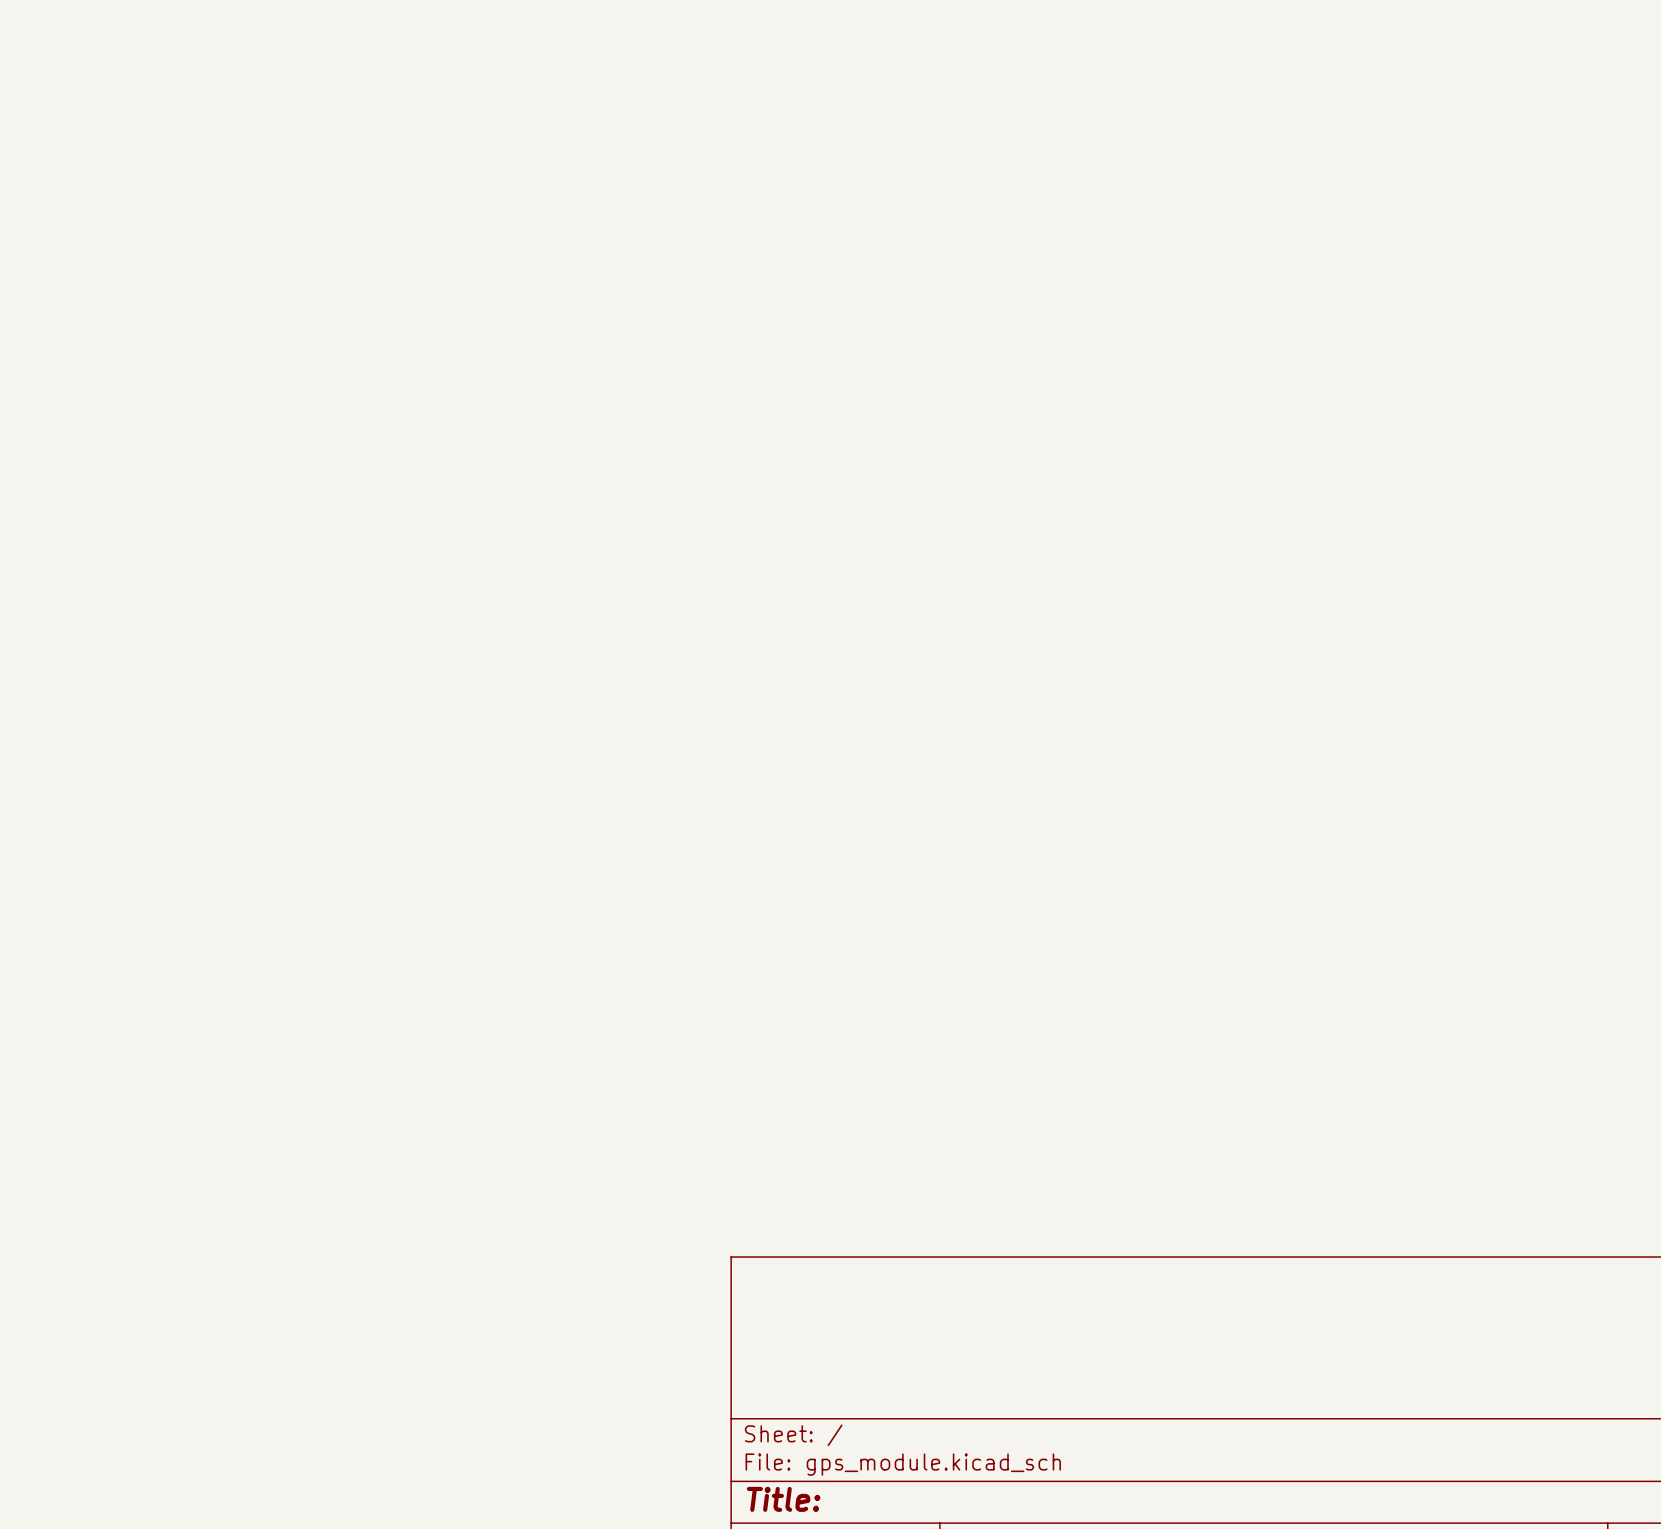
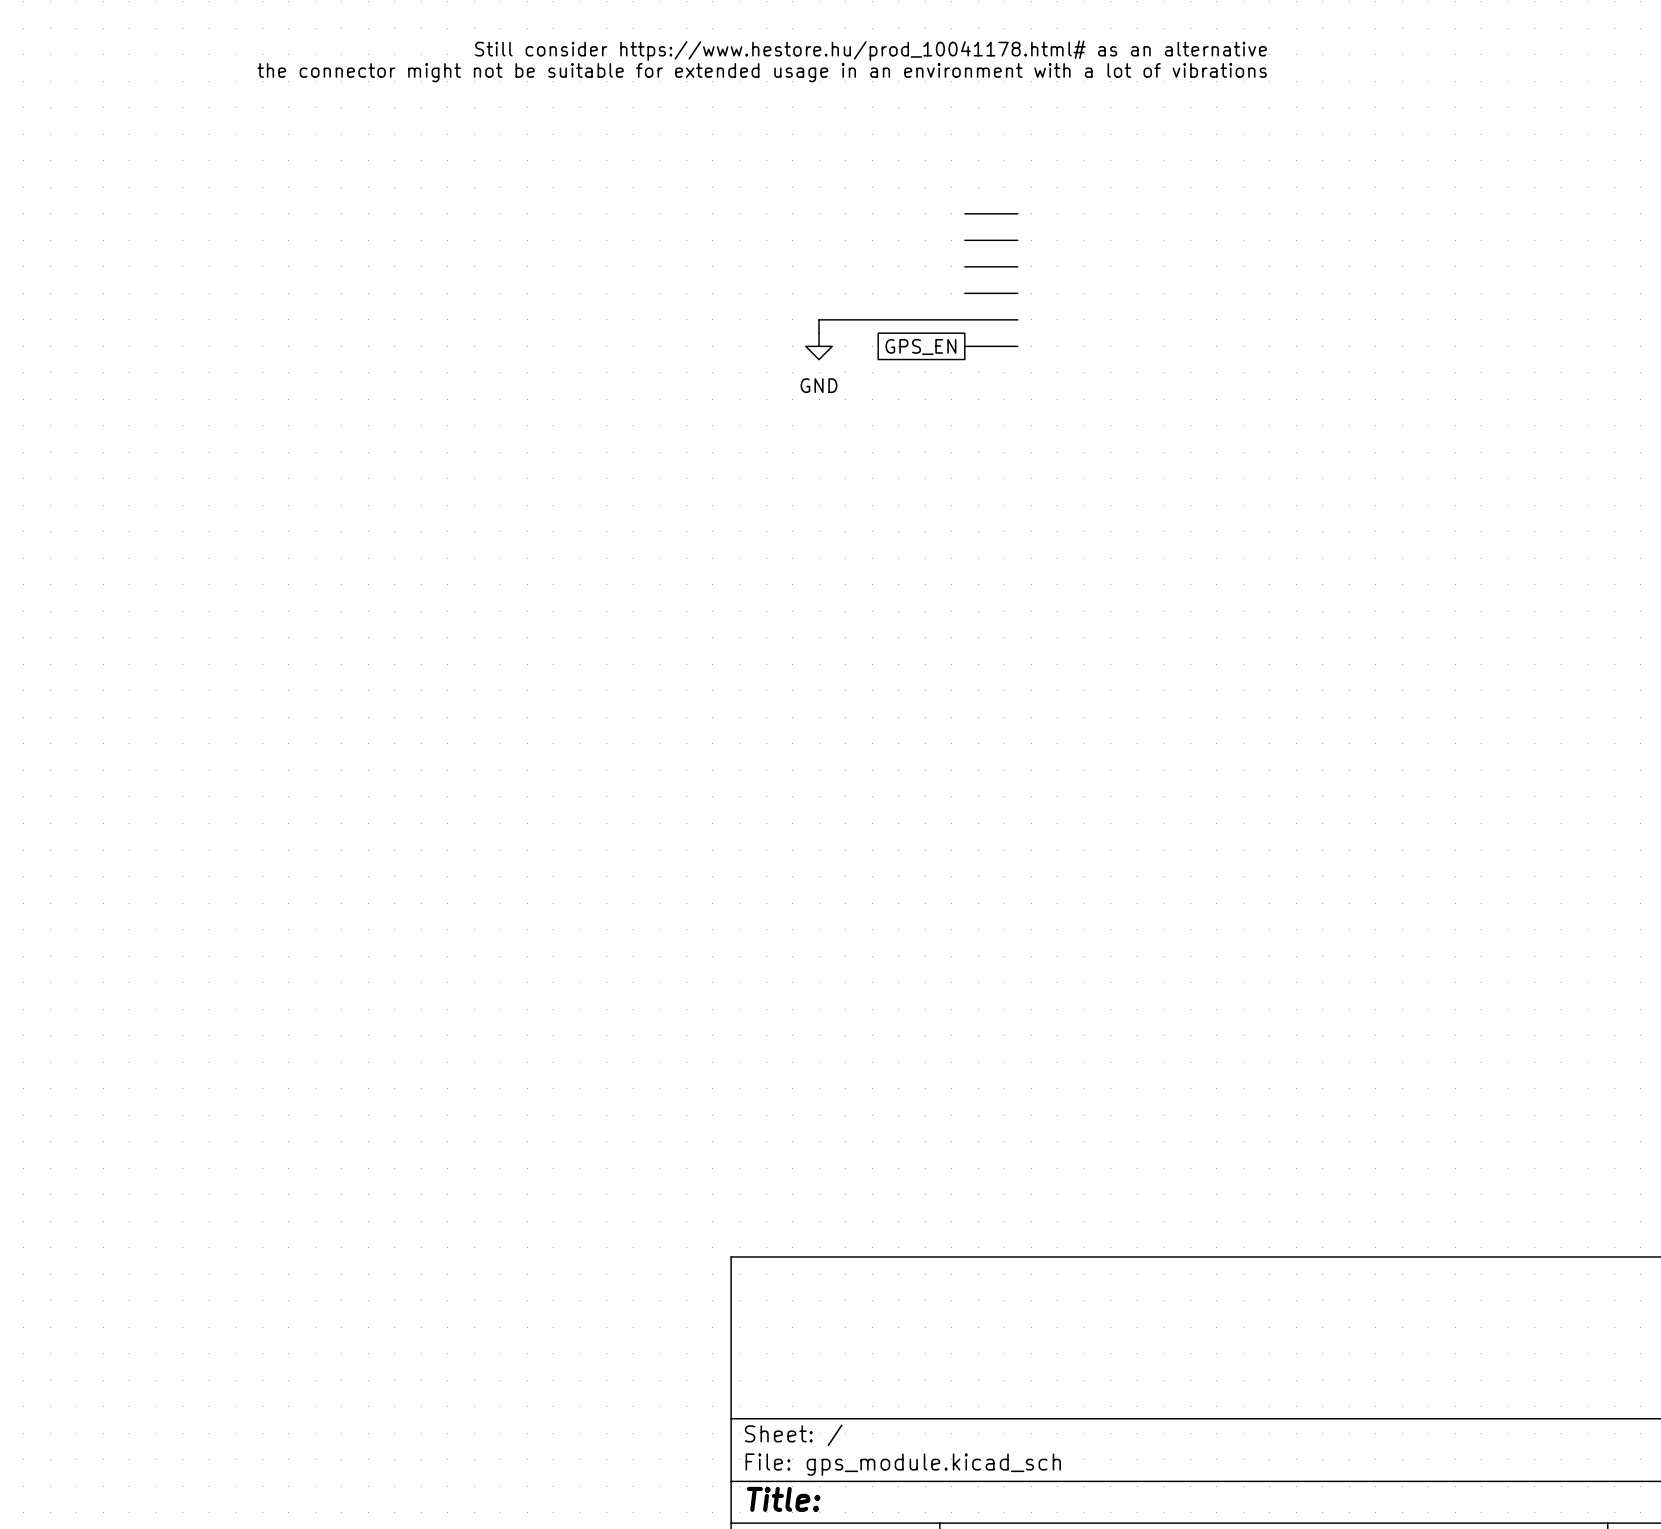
text: none -> Still consider https://www.hestore.hu/prod_10041178.html# as an alternative (870, 50)
text: none -> the connector might not be suitable for extended usage in an environment with a lot of vibrations (762, 72)
wire: none -> (964, 213) (1017, 213)
wire: none -> (964, 240) (1017, 240)
wire: none -> (964, 266) (1017, 266)
wire: none -> (964, 293) (1017, 293)
wire: none -> (1017, 319) (819, 319) (819, 333)
power symbol: none -> GND (819, 346)
wire: none -> (964, 346) (1017, 346)
global label: none -> GPS_EN (920, 347)

